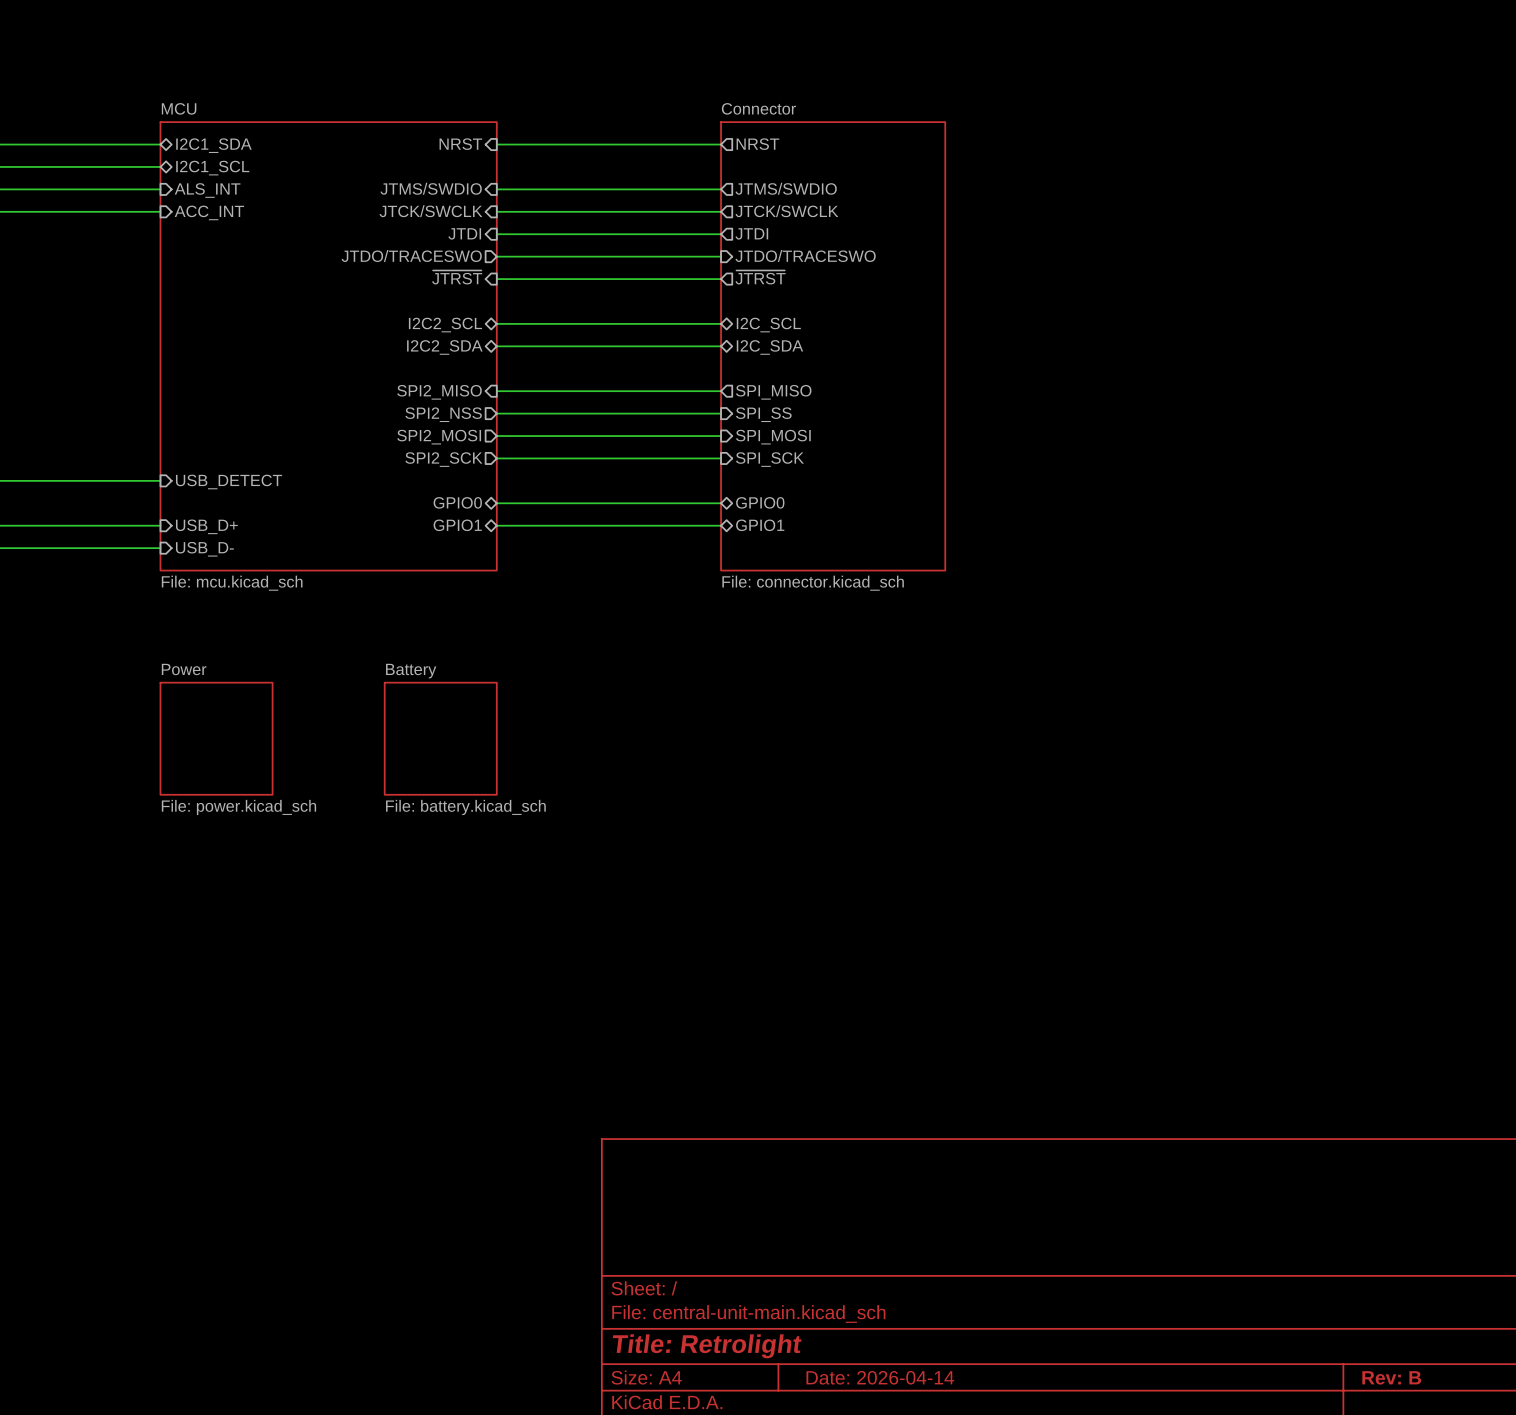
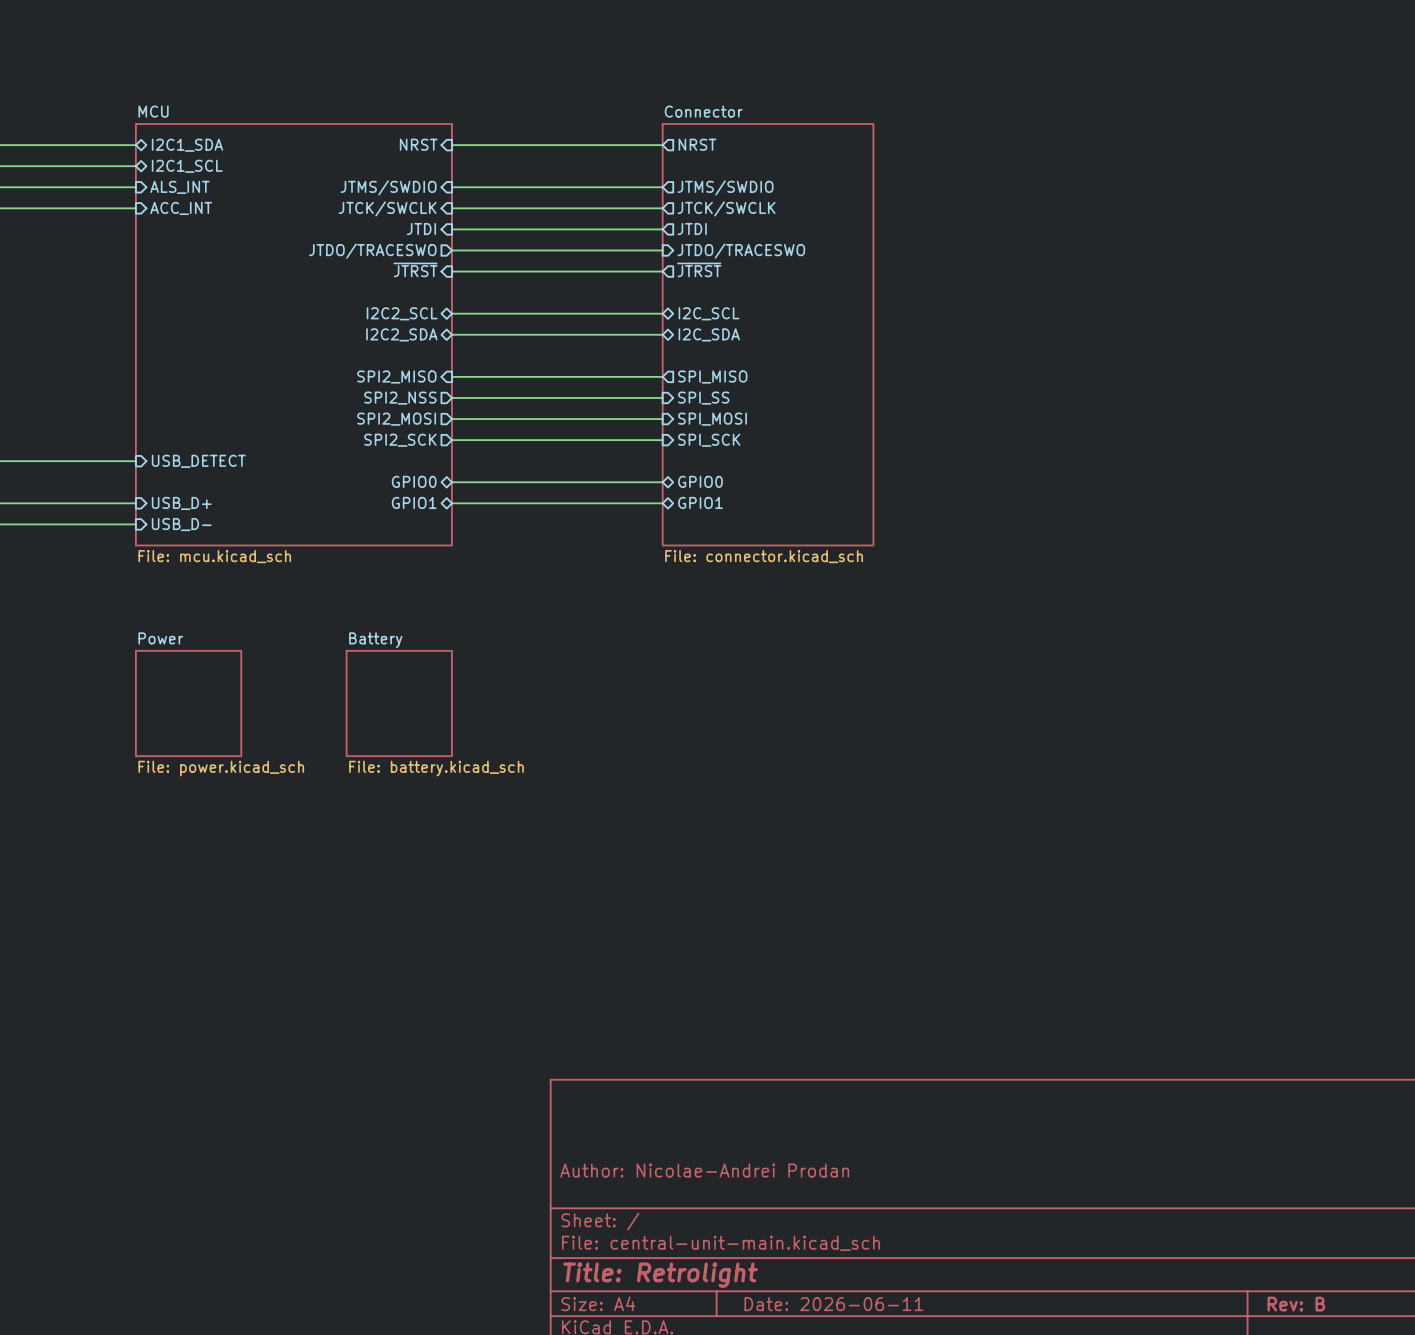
title block: none -> Author: Nicolae-Andrei Prodan (704, 1170)
title block: Date: 2026-04-14 (880, 1377) -> Date: 2026-06-11 (833, 1304)

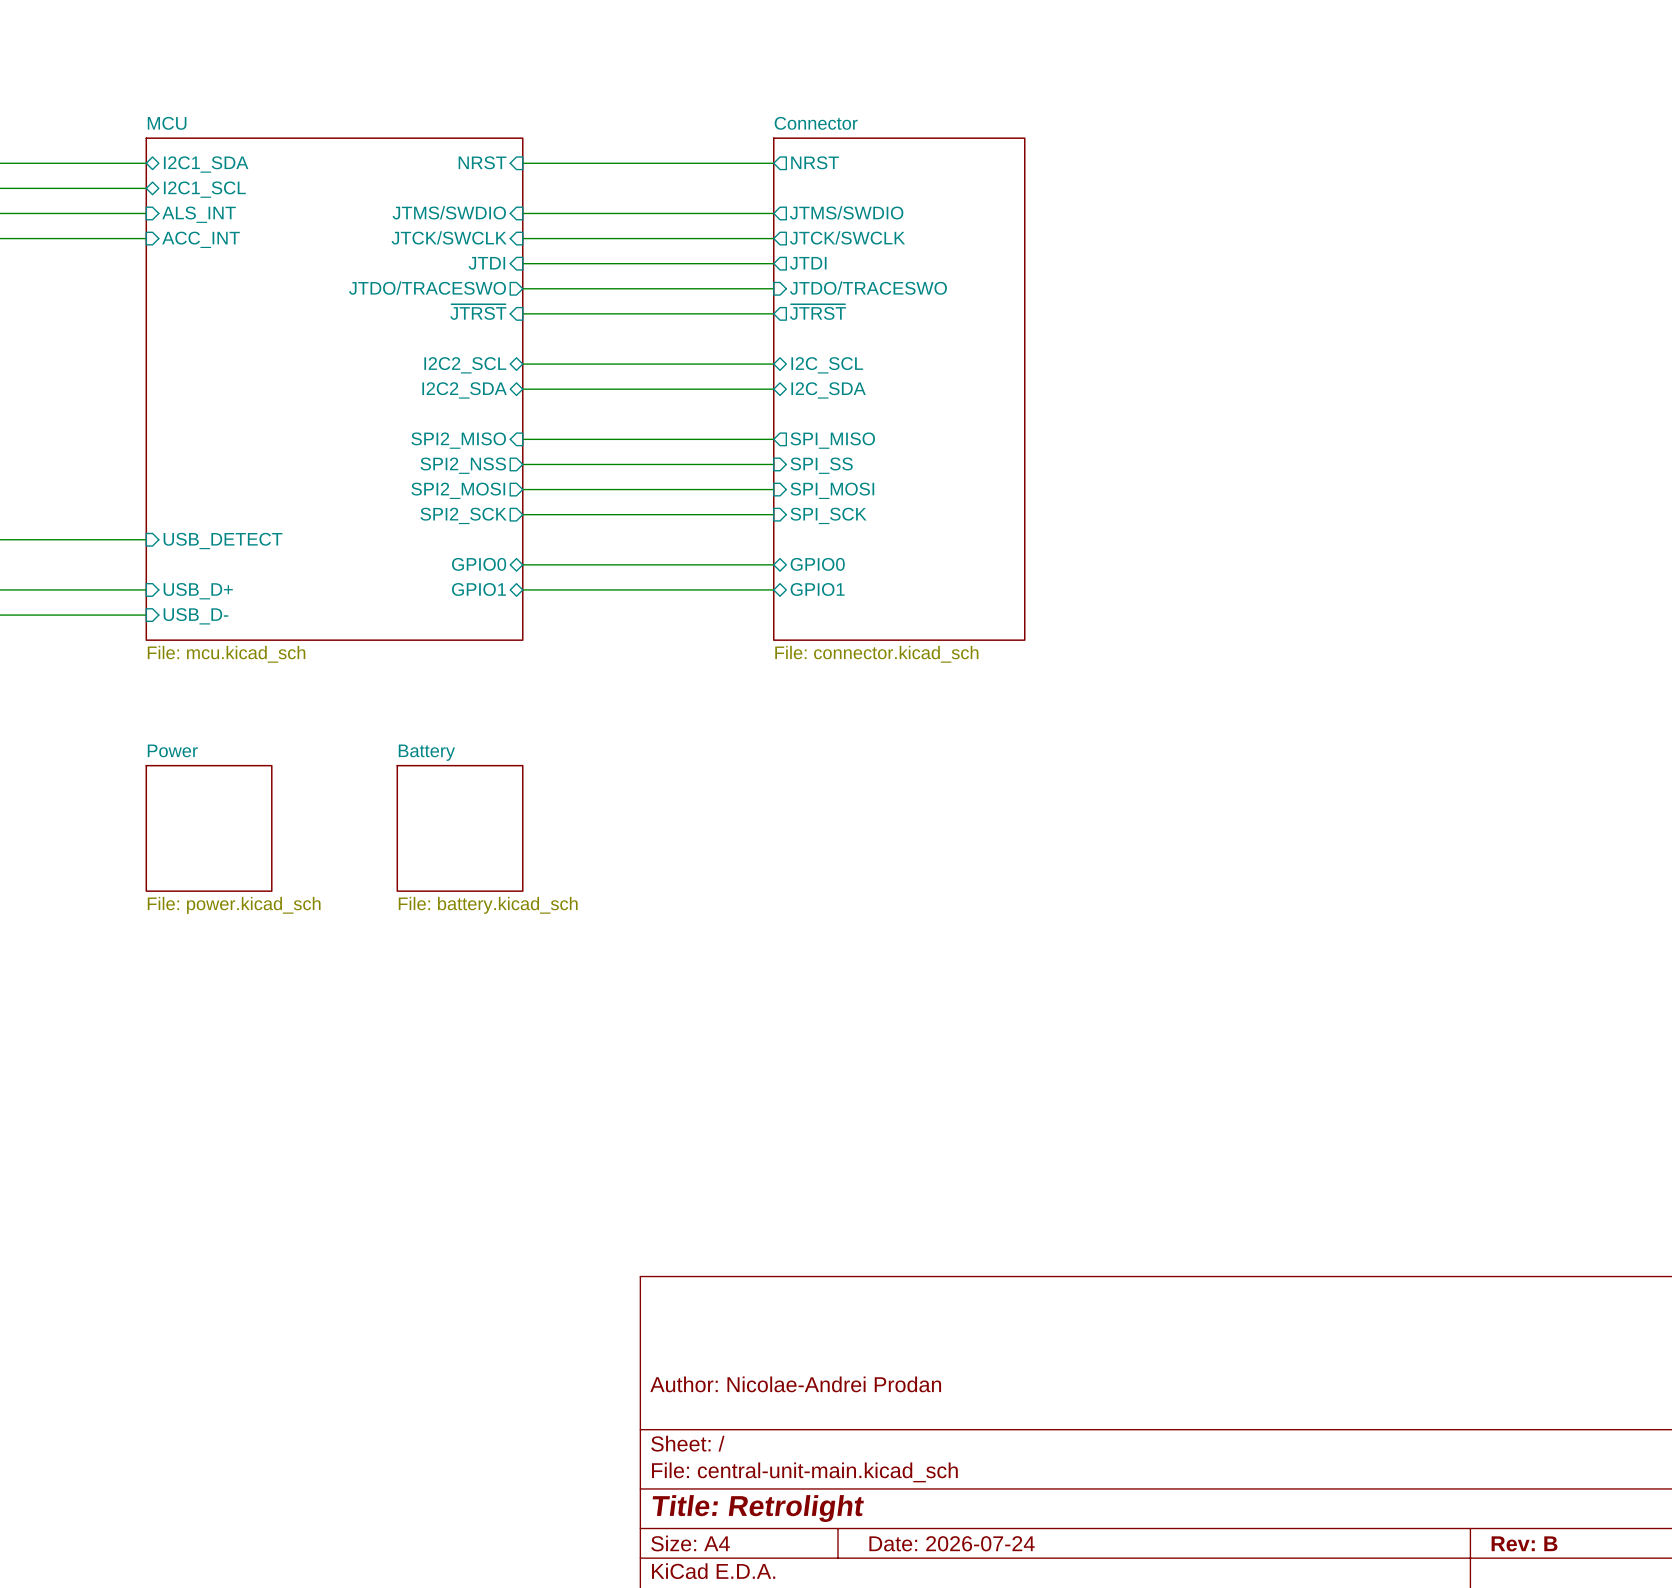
title block: Date: 2026-06-11 (833, 1304) -> Date: 2026-07-24 (952, 1543)

